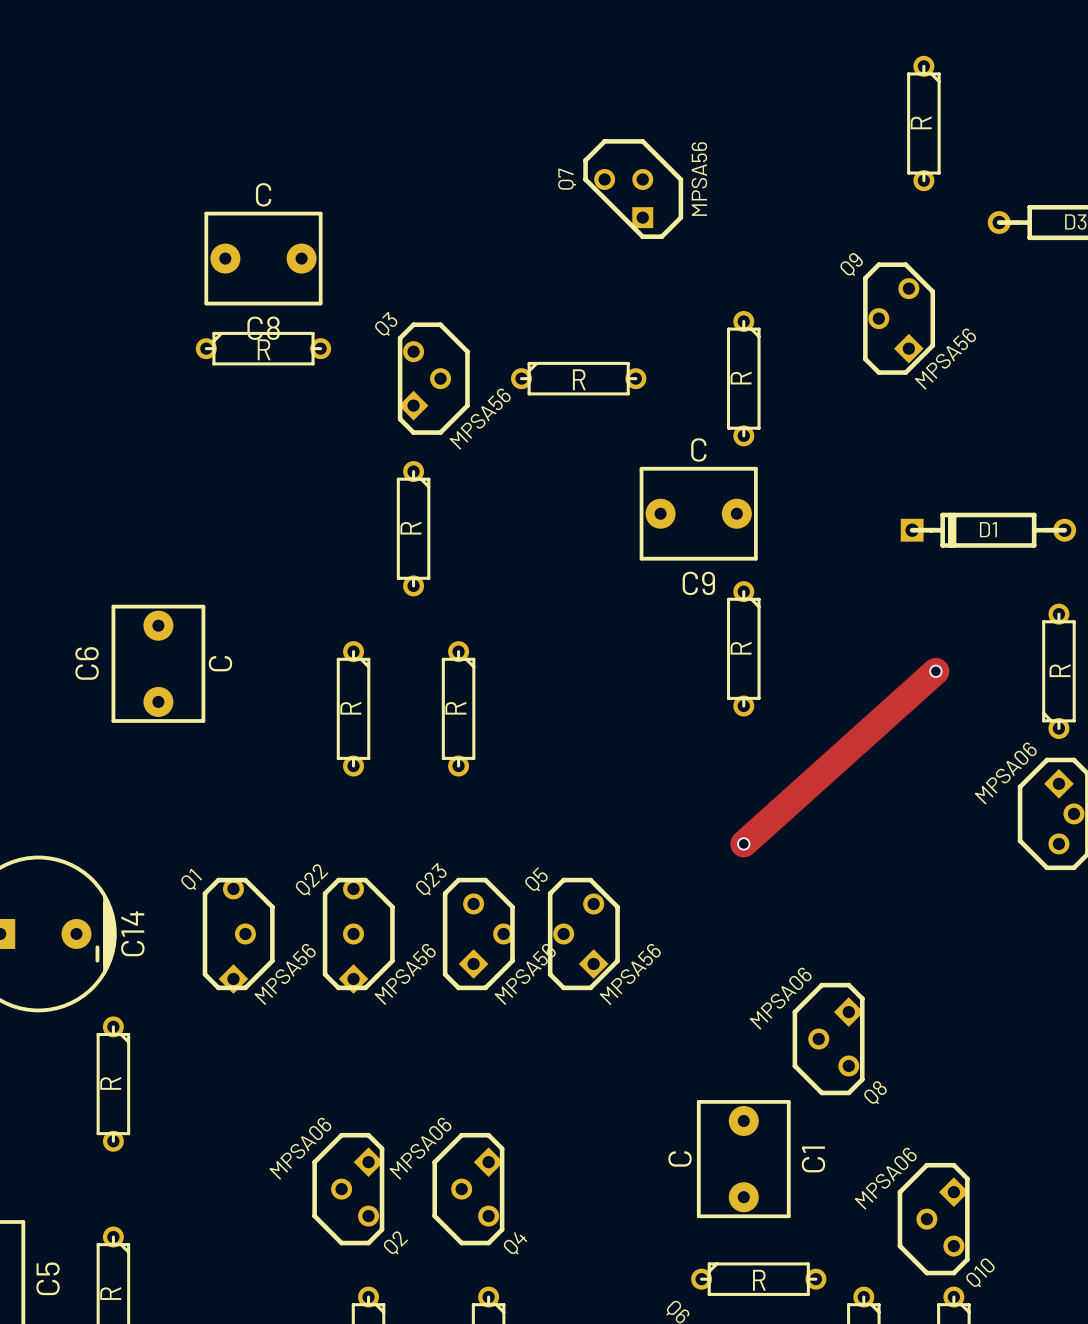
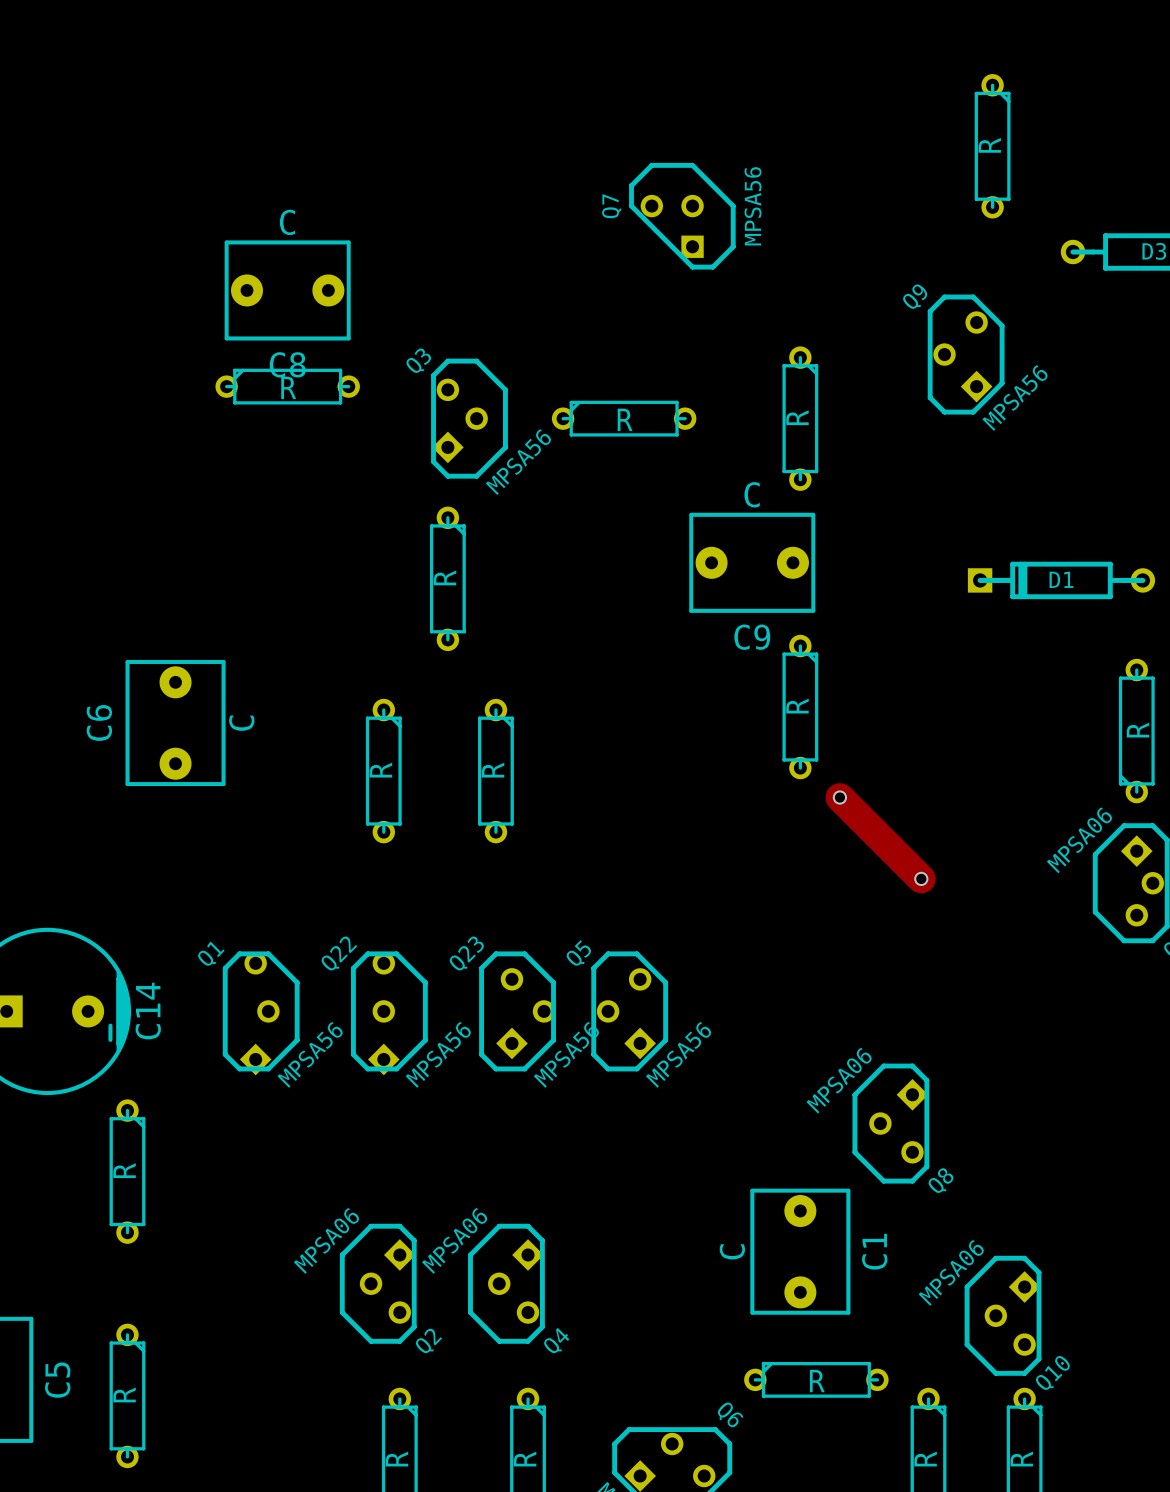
track: (935, 671) (743, 843) -> none
via: (935, 671) -> none
track: none -> (839, 797) (921, 878)
via: none -> (839, 797)
via: none -> (921, 878)
via: (743, 843) -> none

